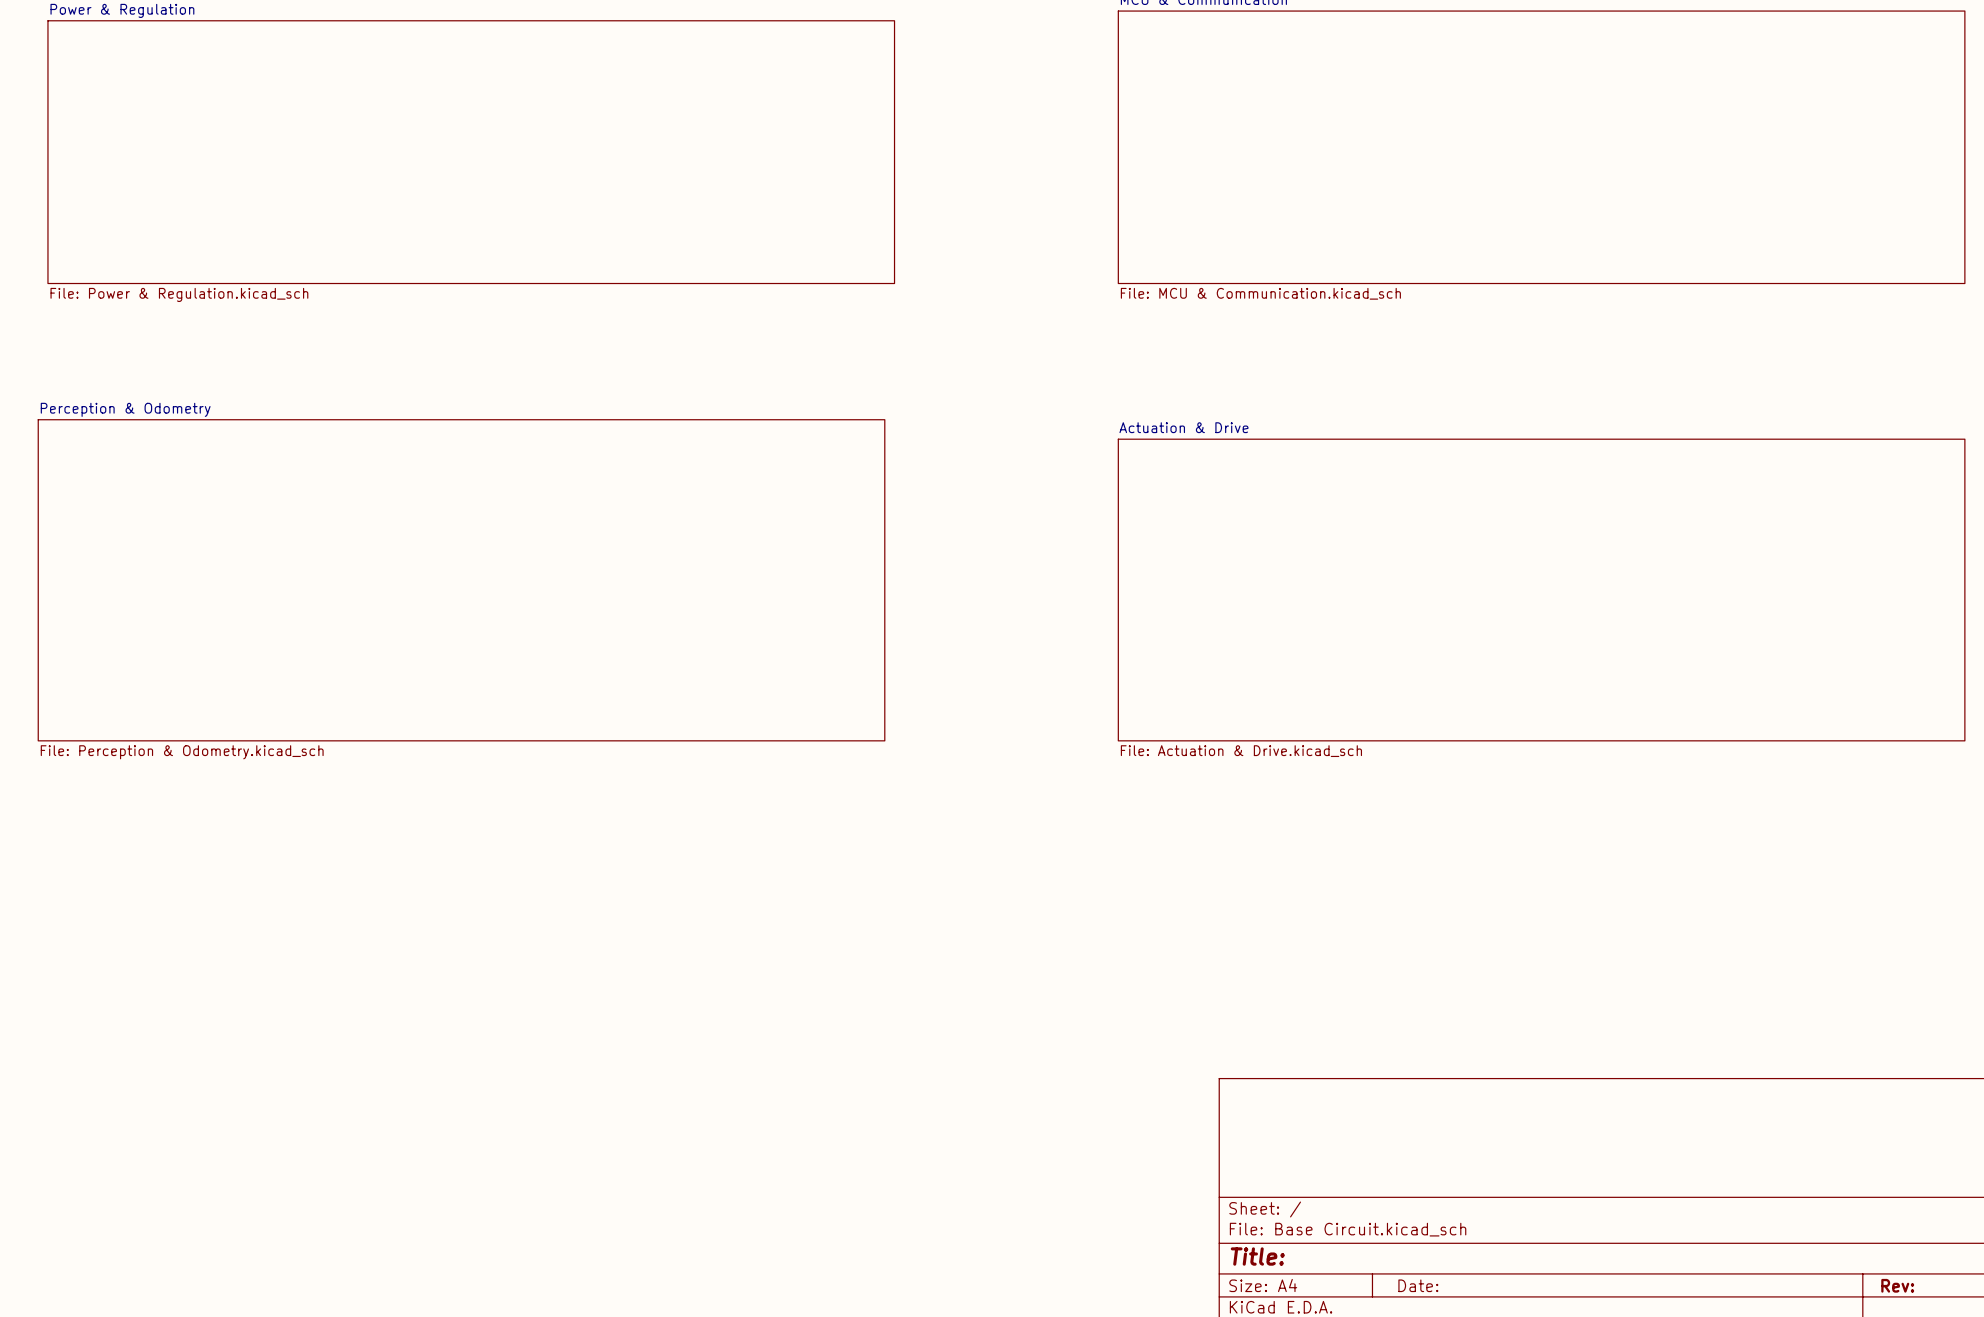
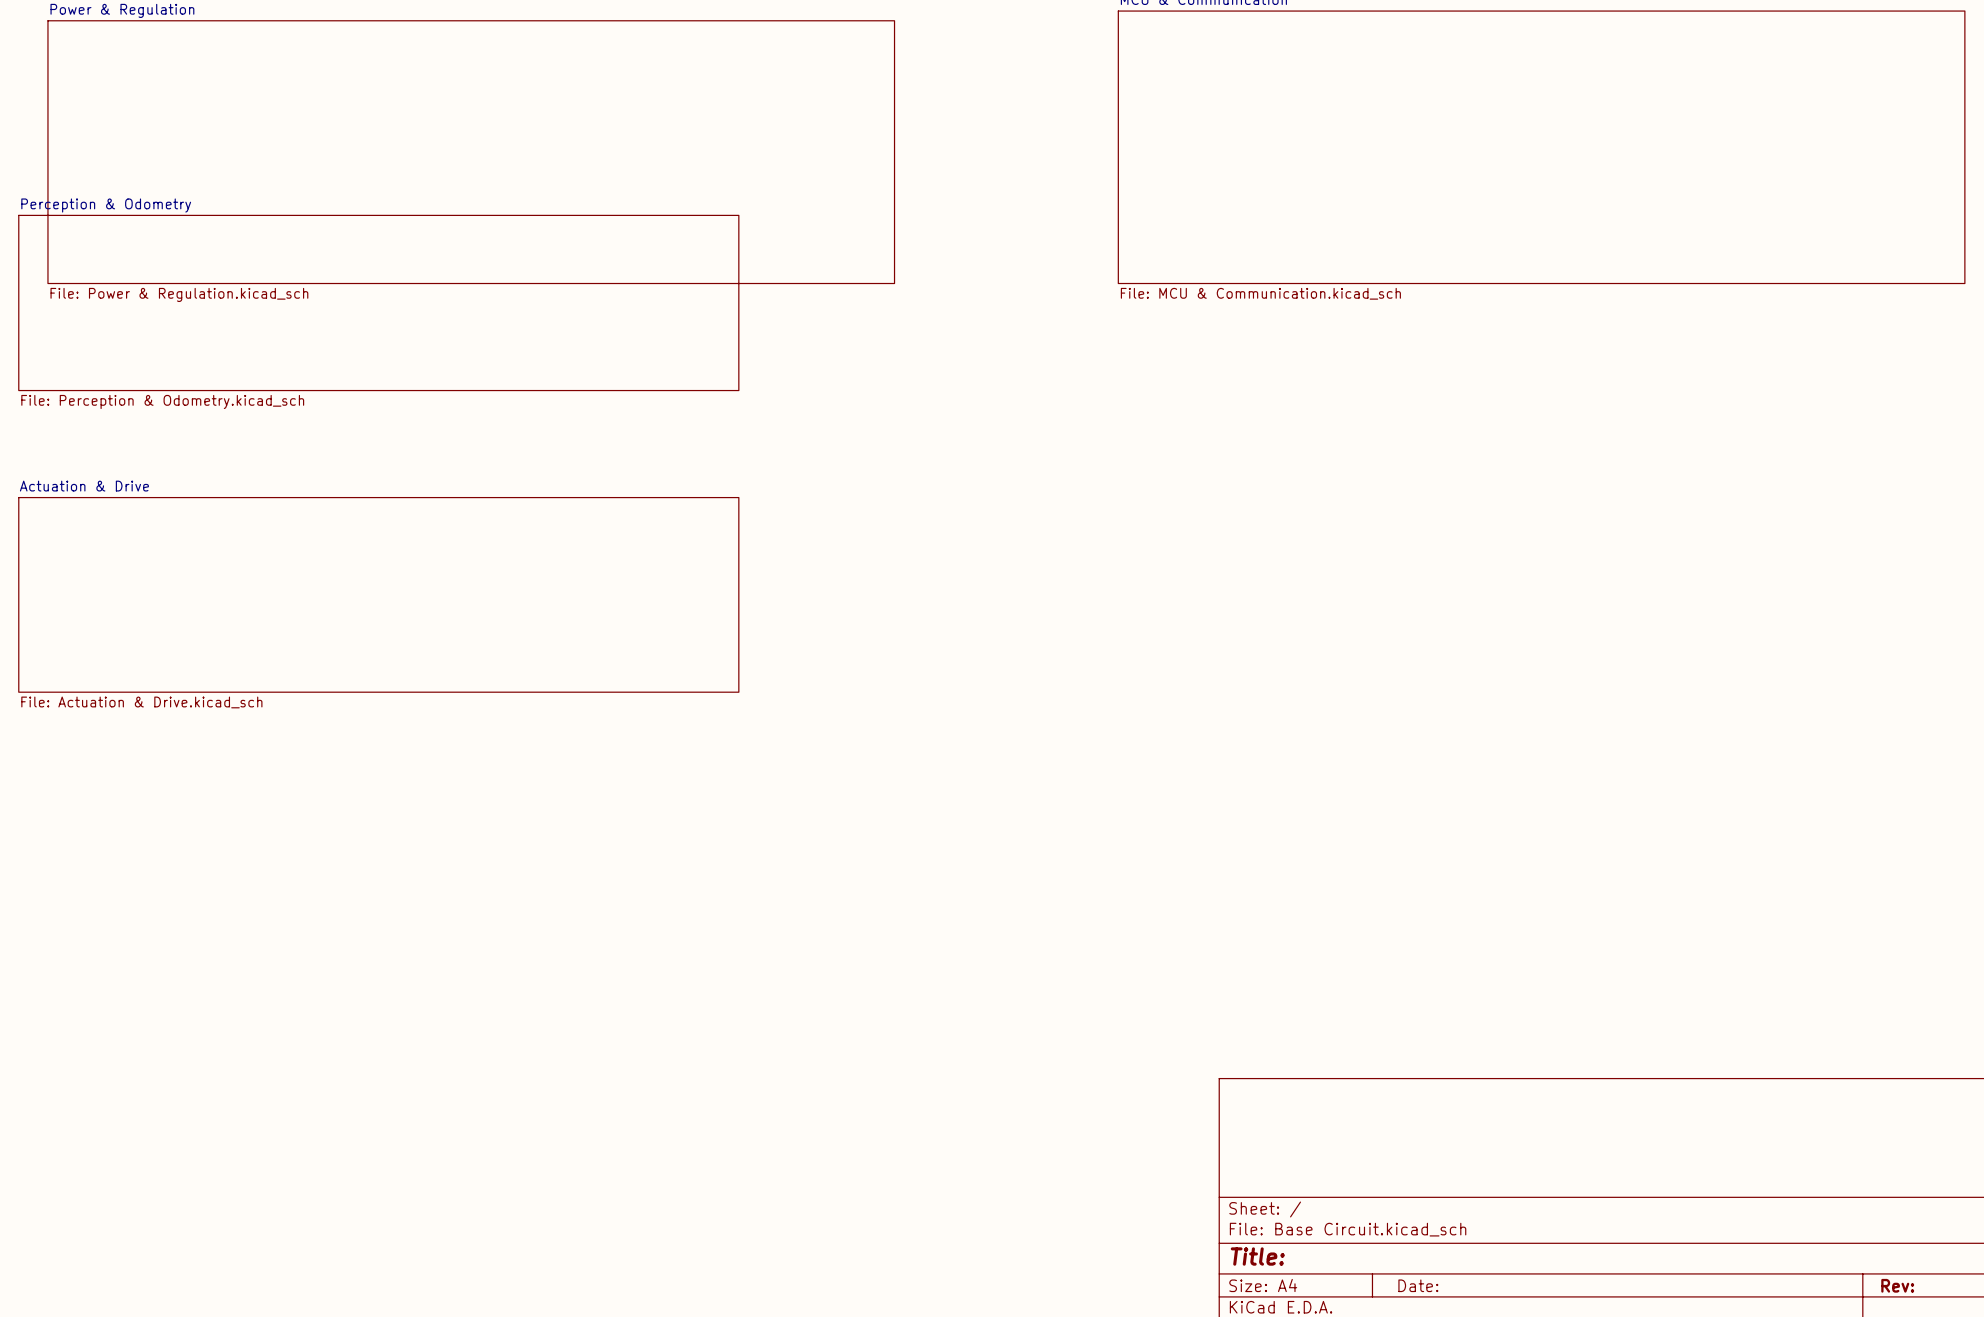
sheet Perception & Odometry: none -> File: Perception & Odometry.kicad_sch (378, 302)
sheet Perception & Odometry: File: Perception & Odometry.kicad_sch (461, 580) -> none
sheet Actuation & Drive: File: Actuation & Drive.kicad_sch (1541, 590) -> none
sheet Actuation & Drive: none -> File: Actuation & Drive.kicad_sch (378, 594)

